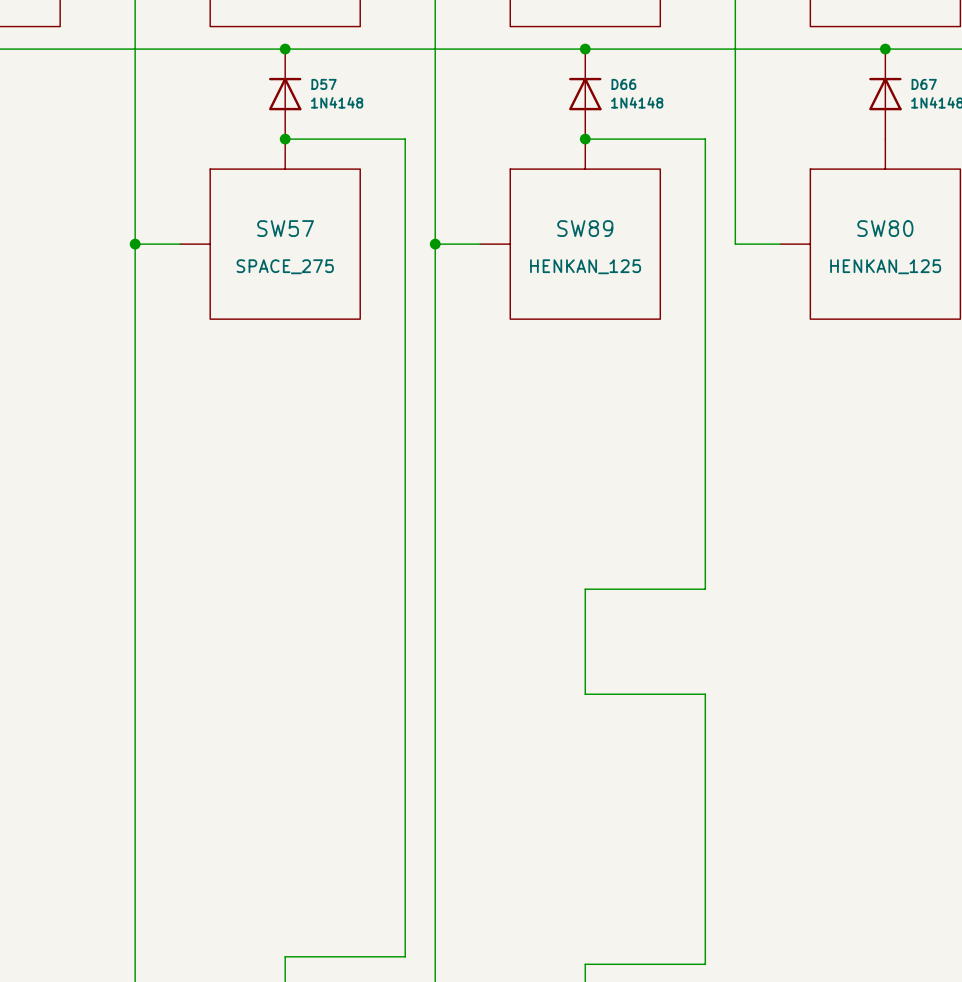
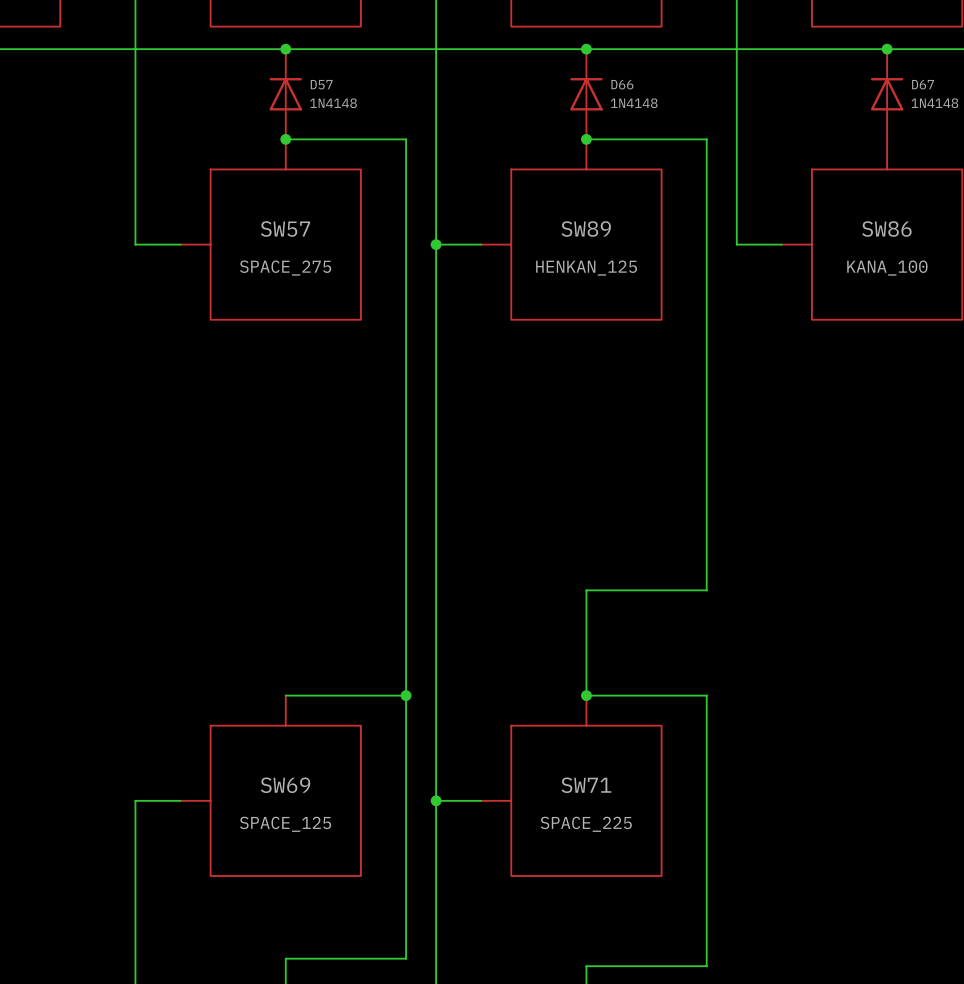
SW80 name: SW80 (885, 228) -> SW86 (886, 229)
wire: (135, 244) (135, 799) -> (180, 800) (135, 800)
junction: (135, 244) -> none
SW80 value: HENKAN_125 (885, 266) -> KANA_100 (887, 268)
wire: none -> (285, 695) (406, 695)
junction: none -> (406, 695)
junction: none -> (586, 695)
SW69: none -> SPACE_125 (270, 785)
SW71: none -> SPACE_225 (571, 785)
wire: none -> (436, 800) (481, 800)
junction: none -> (436, 800)

